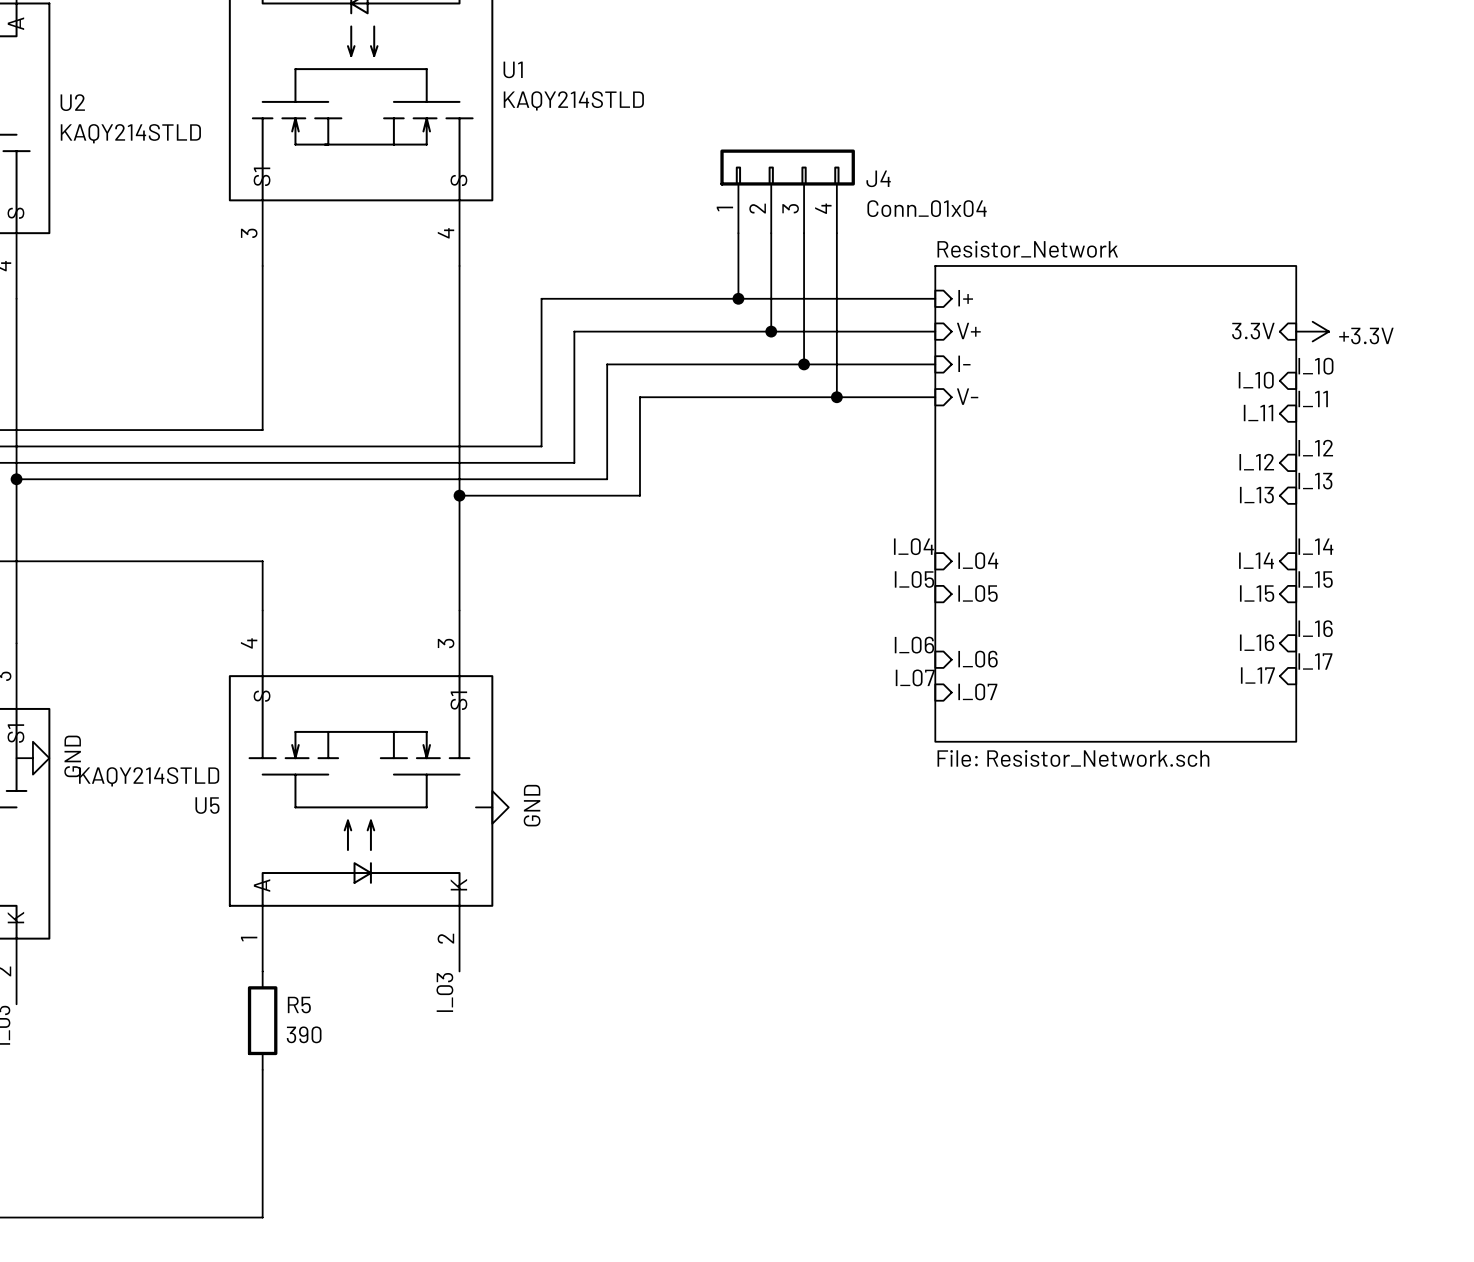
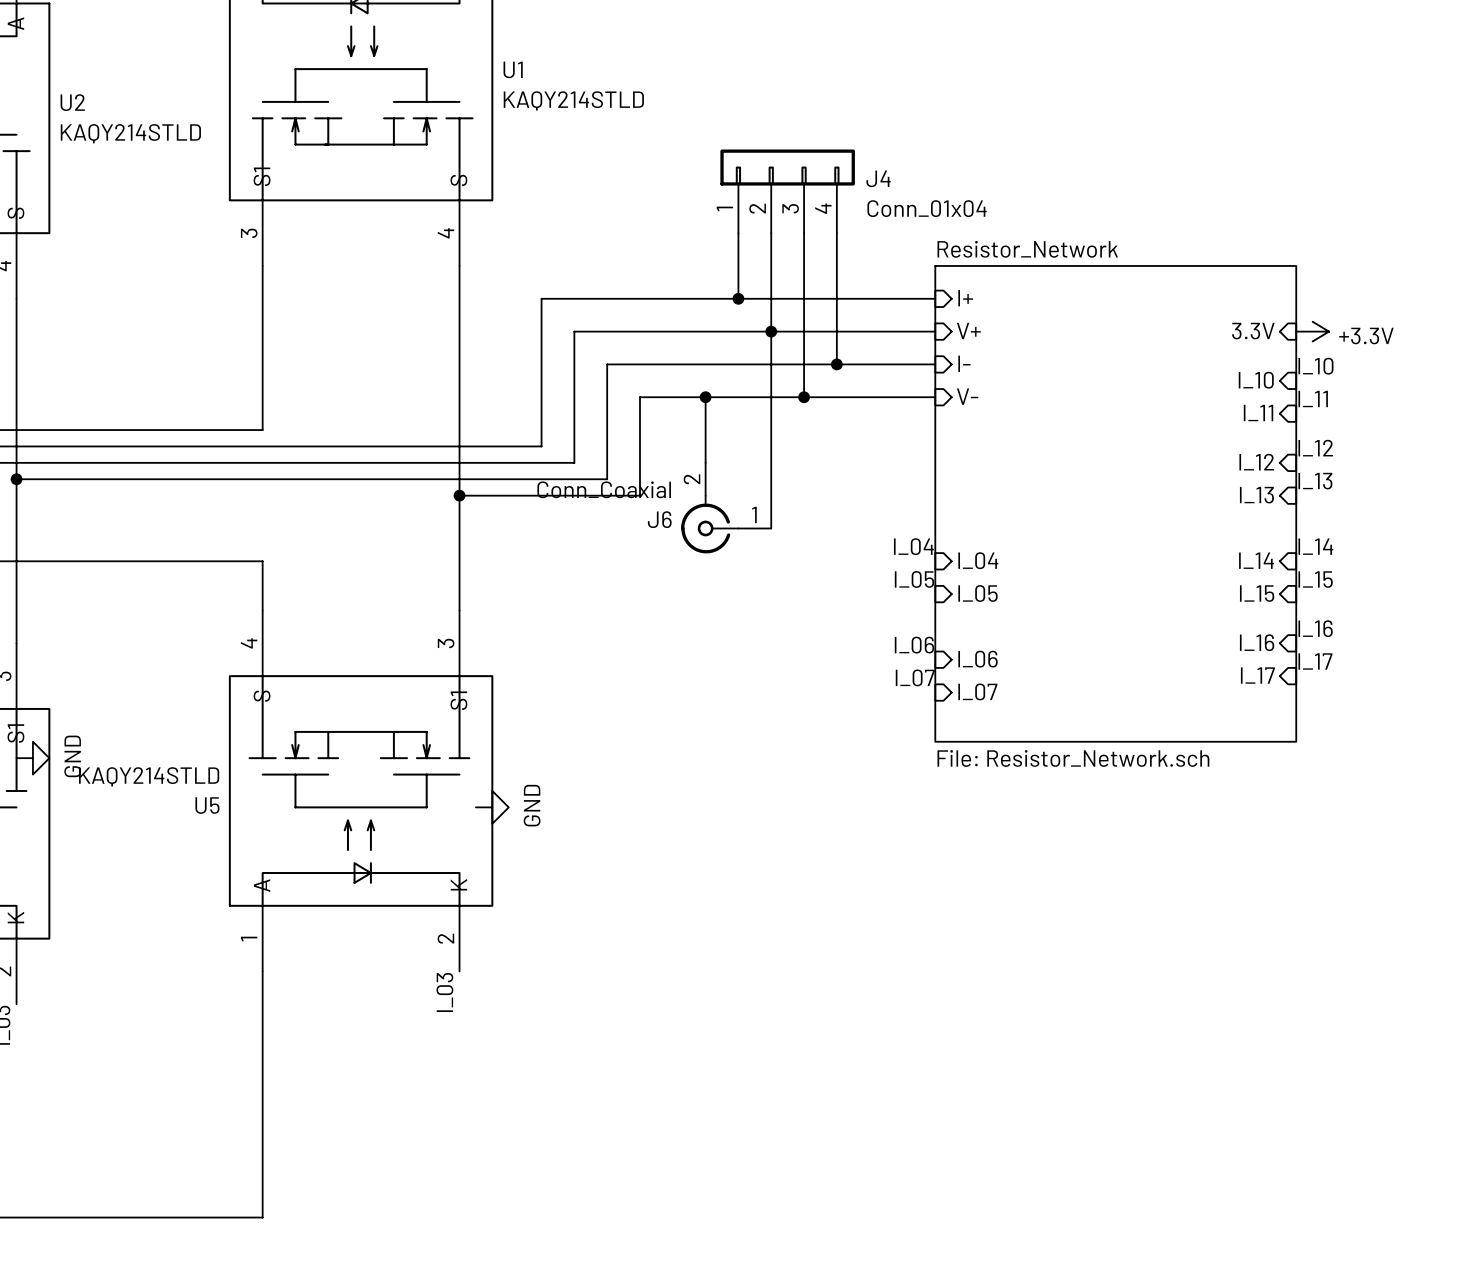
wire: none -> (771, 331) (771, 528)
junction: (804, 364) -> none
wire: (836, 364) (836, 397) -> (804, 364) (804, 397)
junction: none -> (836, 364)
wire: none -> (705, 397) (705, 462)
junction: none -> (705, 397)
junction: none -> (804, 397)
junction: (836, 397) -> none
J6: none -> Conn_Coaxial (726, 508)
wire: none -> (262, 971) (262, 1069)
R5: 390 (262, 1020) -> none

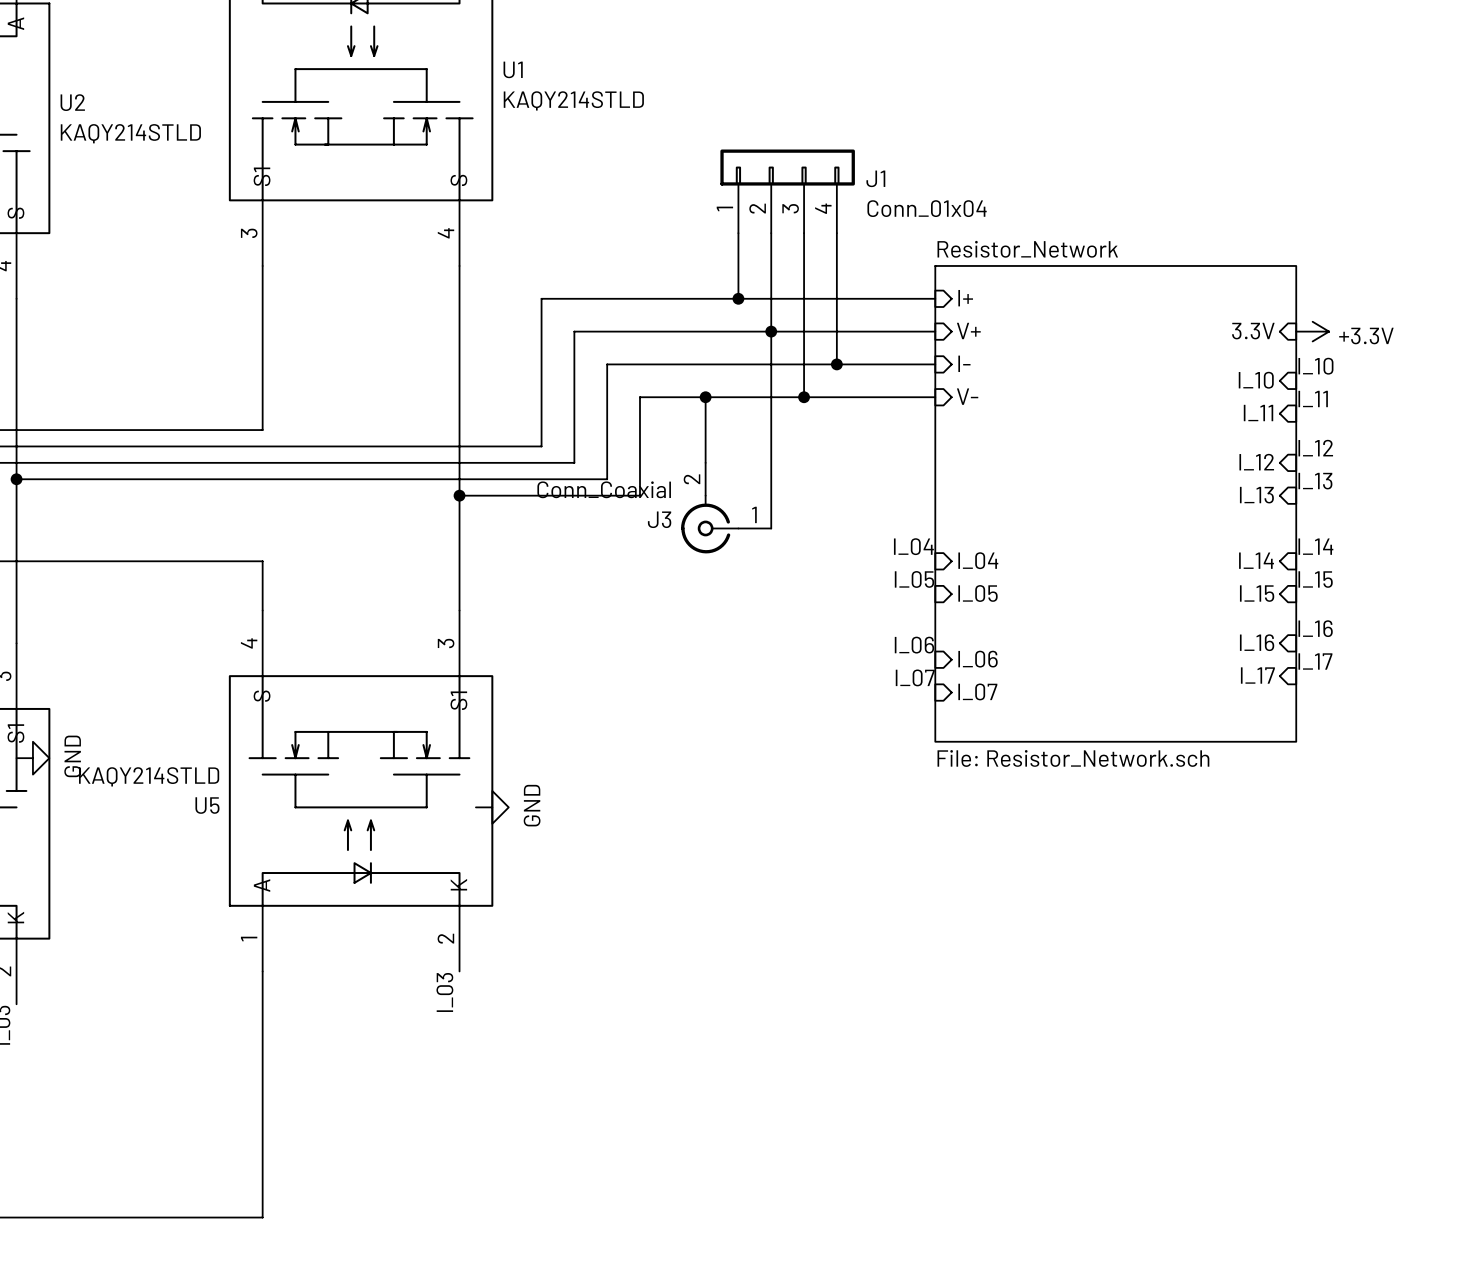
J4 name: J4 (878, 178) -> J1 (875, 178)
J6 name: J6 (659, 519) -> J3 (659, 519)

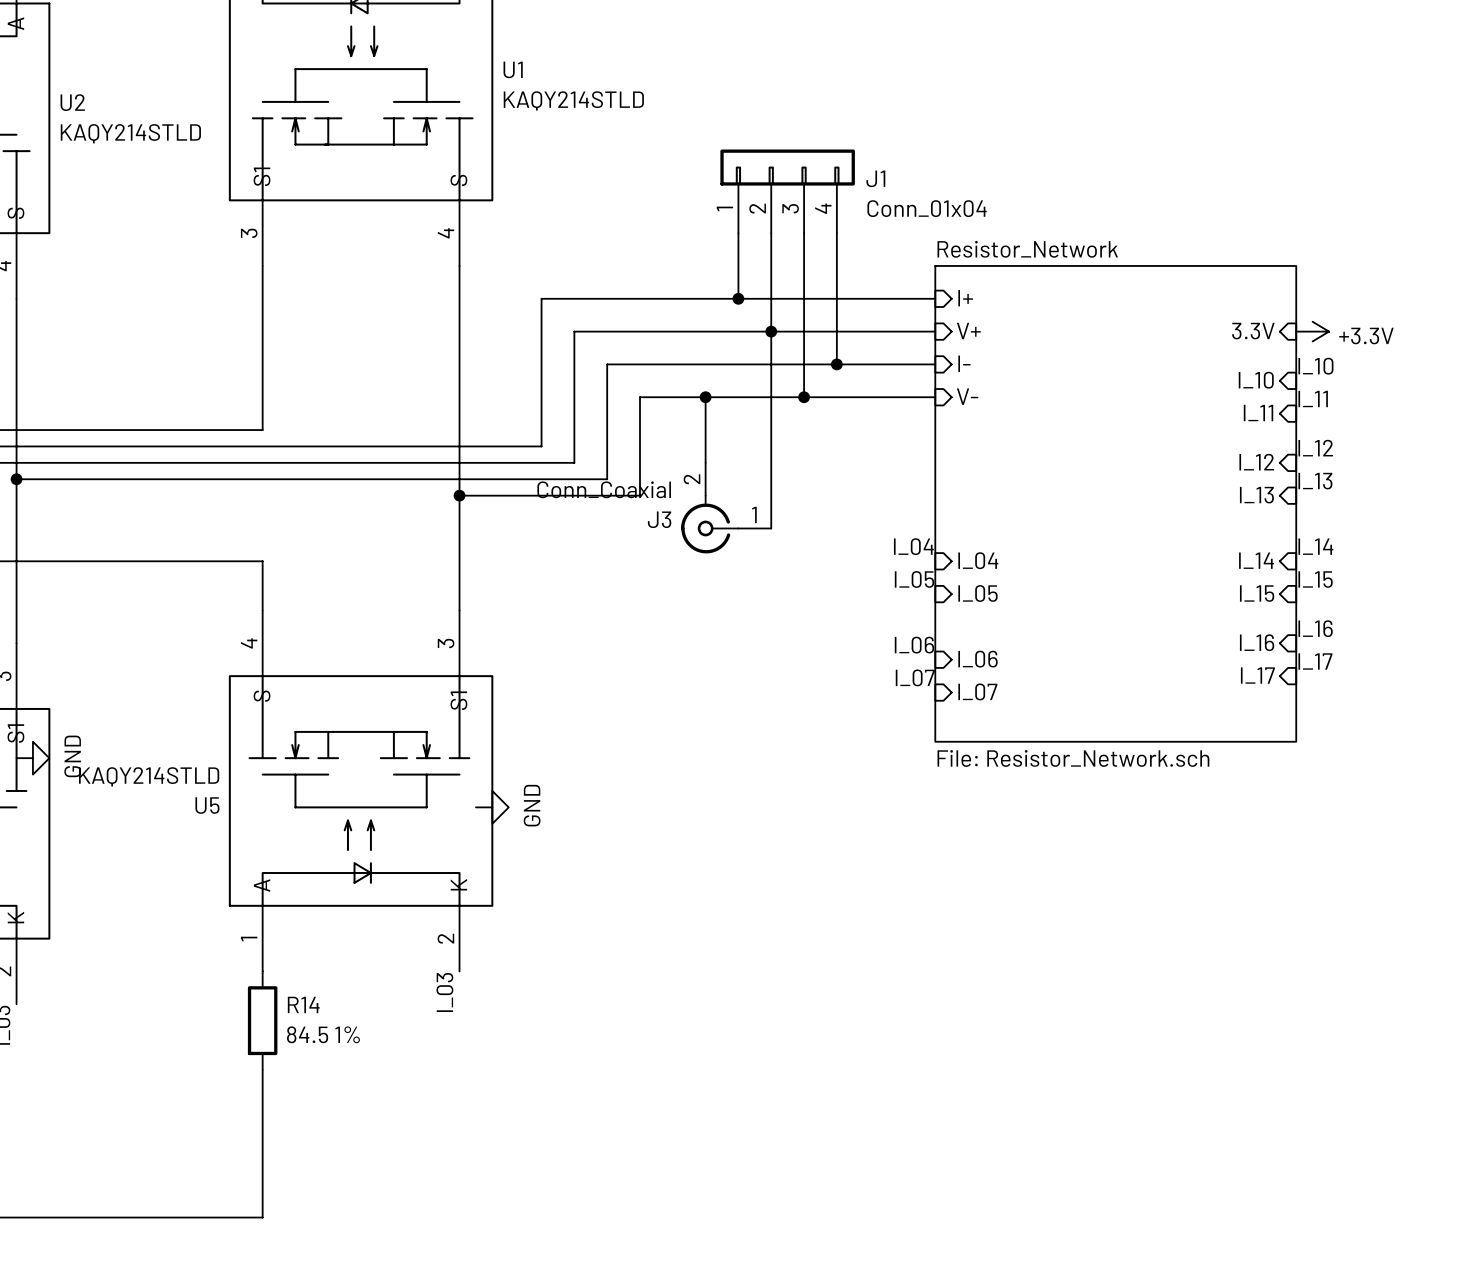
wire: (262, 971) (262, 1069) -> none
R14: none -> 84.5 1% (262, 1020)

